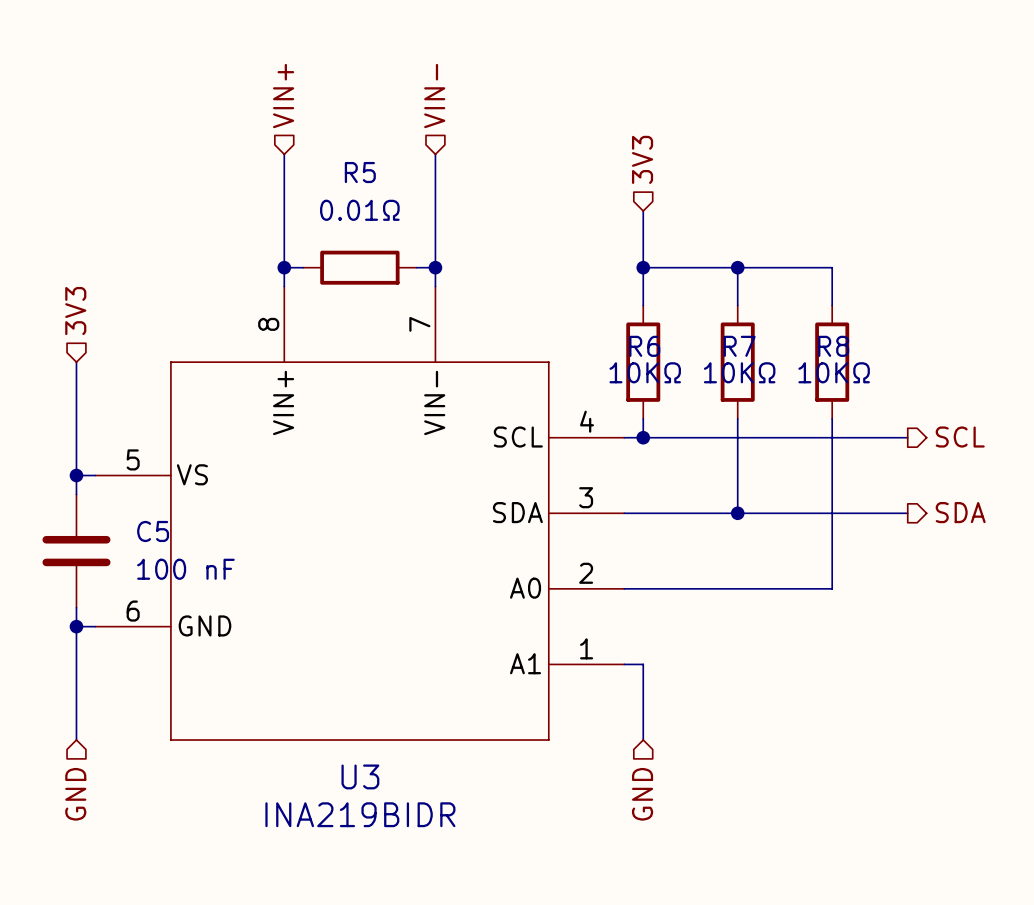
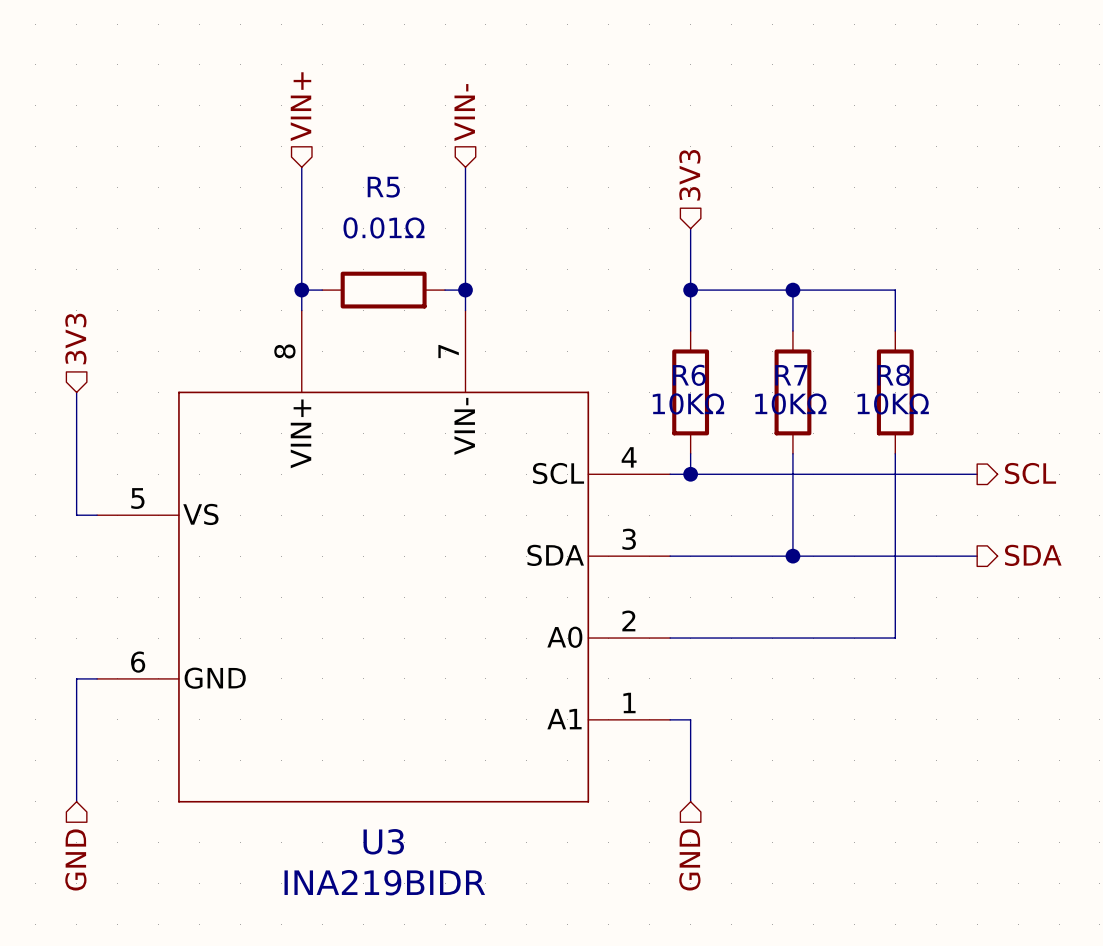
wire: (76, 475) (76, 494) -> none
junction: (76, 475) -> none
C5: 100 nF (76, 551) -> none
wire: (76, 607) (76, 626) -> none
junction: (76, 626) -> none

